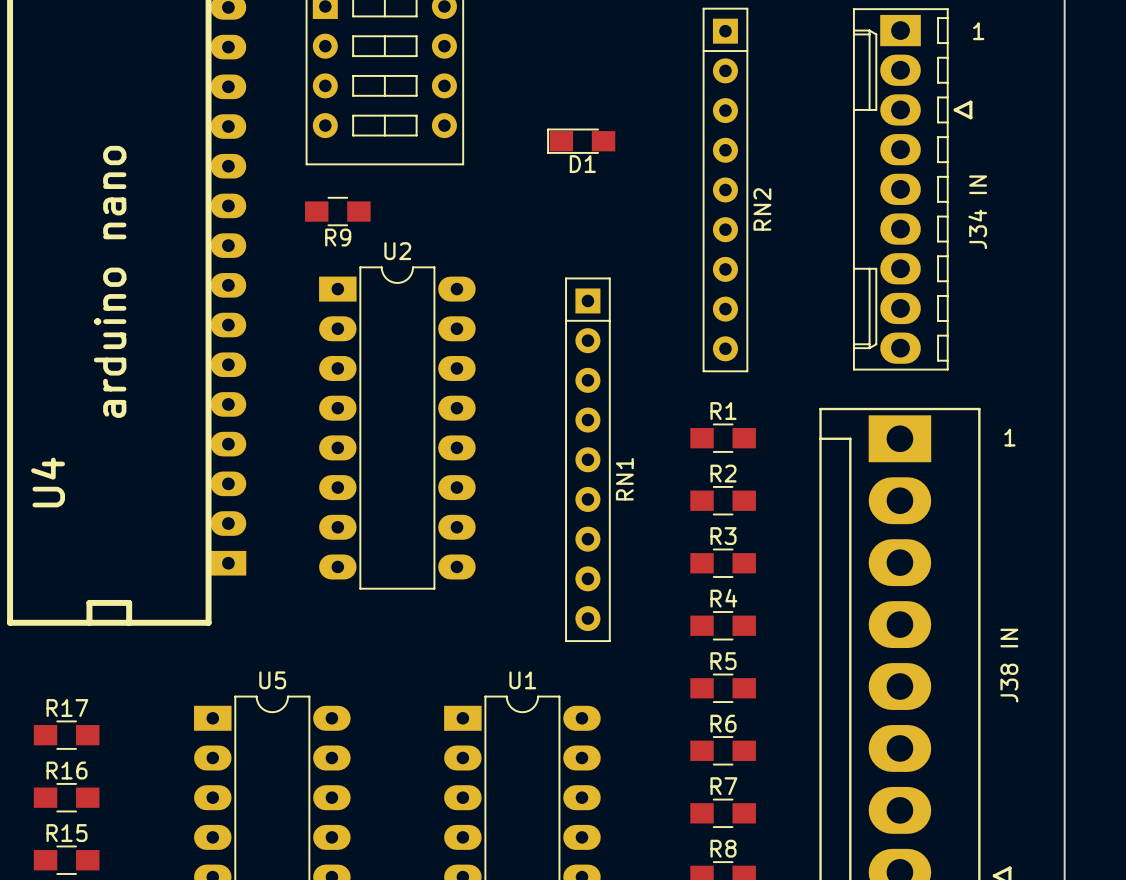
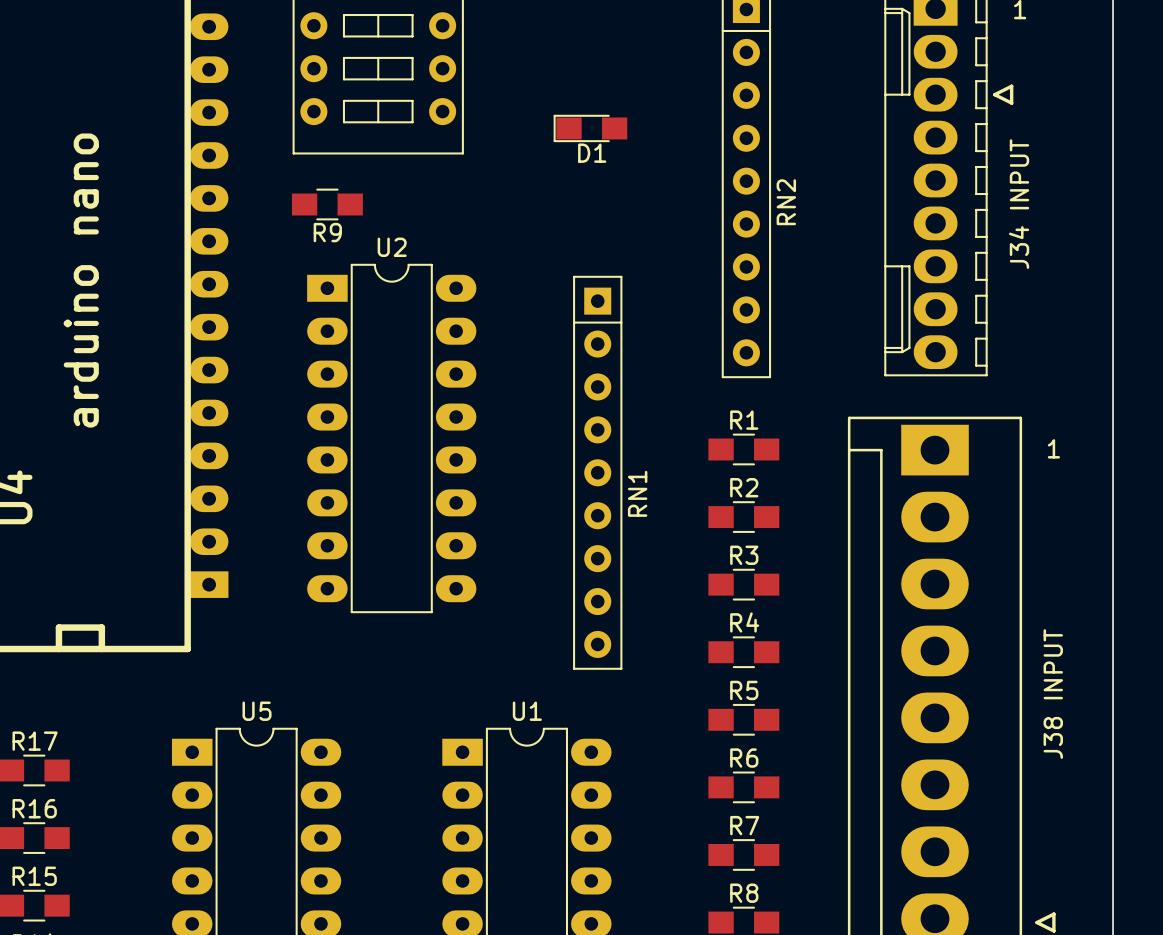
J34 IN name: J34 IN (977, 212) -> J34 INPUT (1019, 204)
J38 IN name: J38 IN (1009, 665) -> J38 INPUT (1053, 694)

